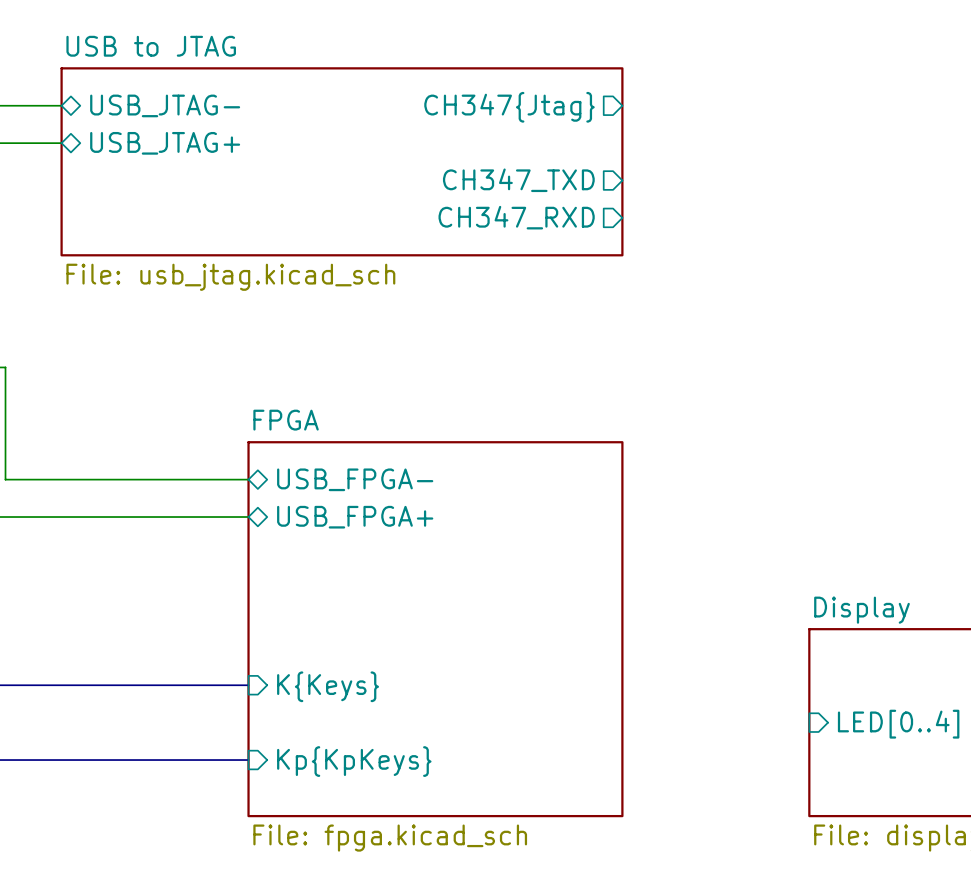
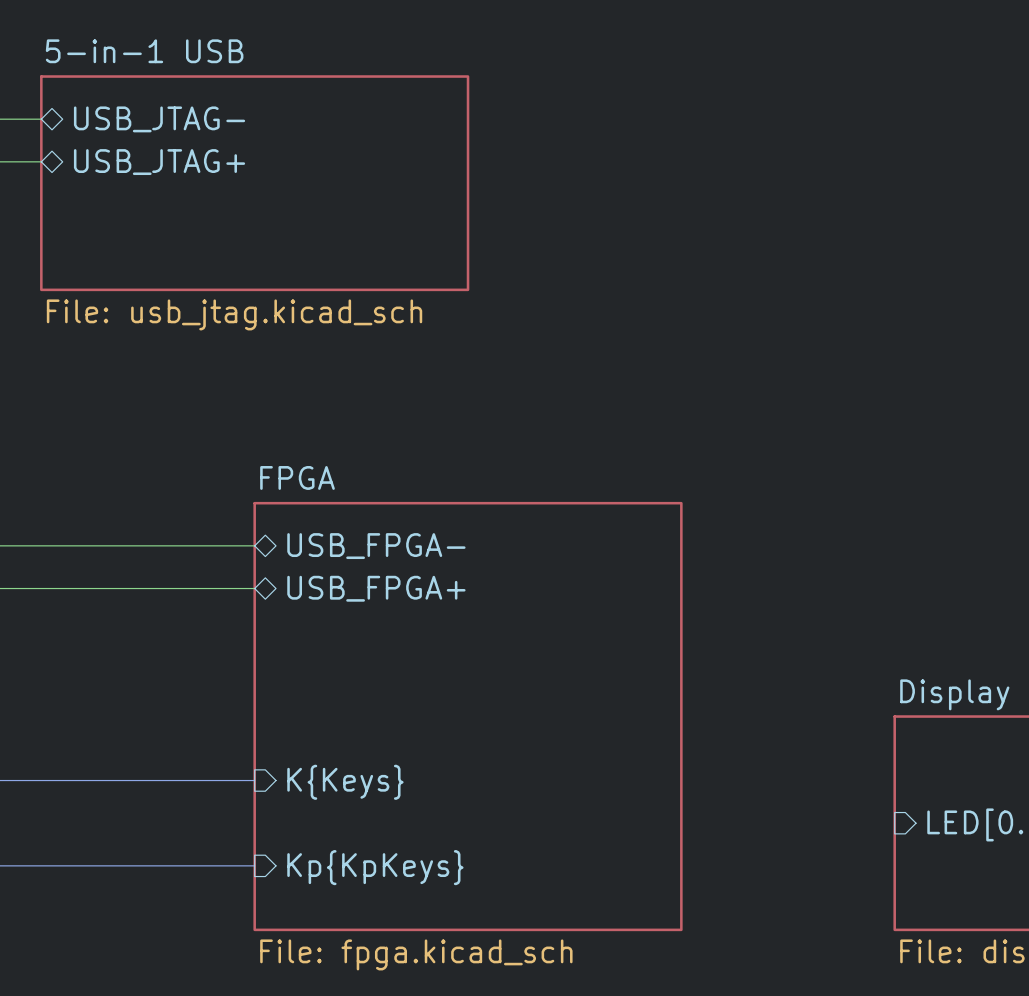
sheet pin: CH347{Jtag} (509, 107) -> none
sheet 5-in-1 USB: none -> File: usb_jtag.kicad_sch (254, 183)
sheet USB to JTAG: File: usb_jtag.kicad_sch (341, 161) -> none
sheet pin: CH347_TXD (518, 180) -> none
sheet pin: CH347_RXD (516, 217) -> none

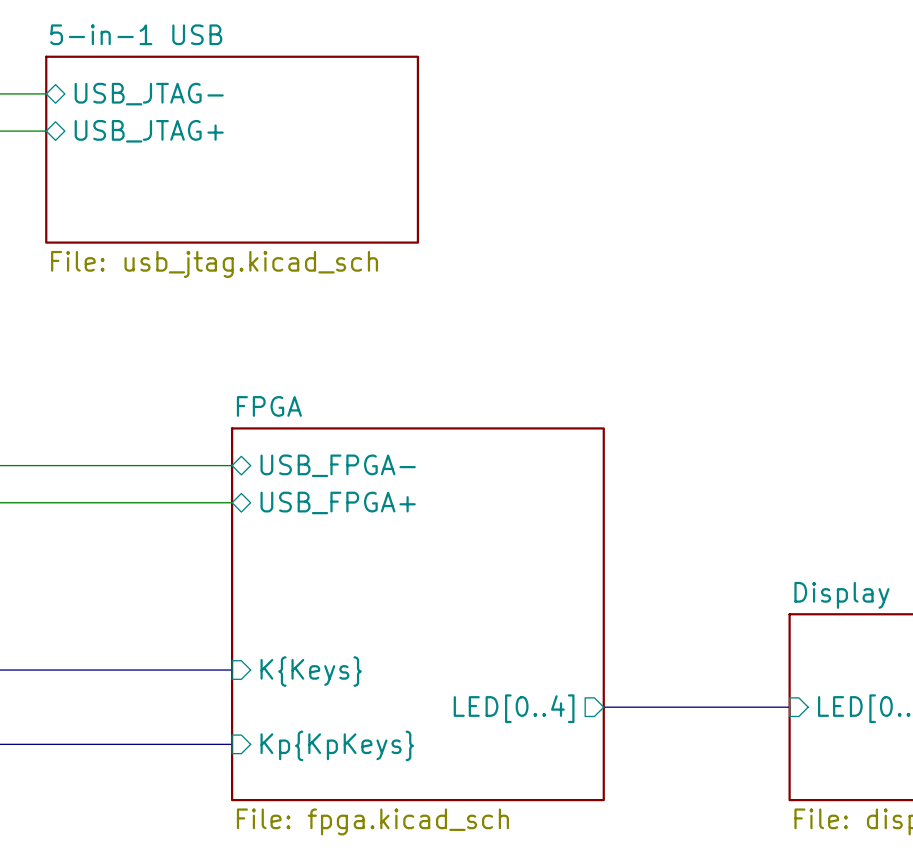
bus: none -> (603, 707) (789, 707)
sheet pin: none -> LED[0..4] (514, 708)

